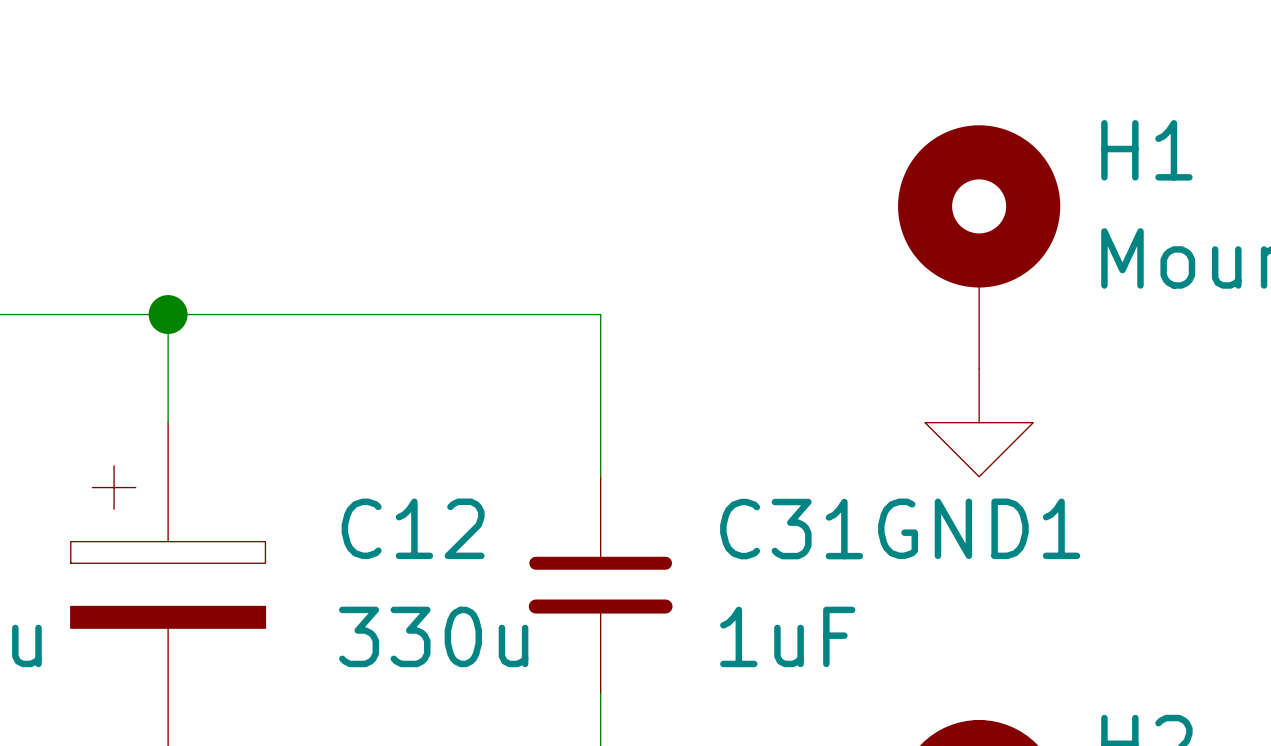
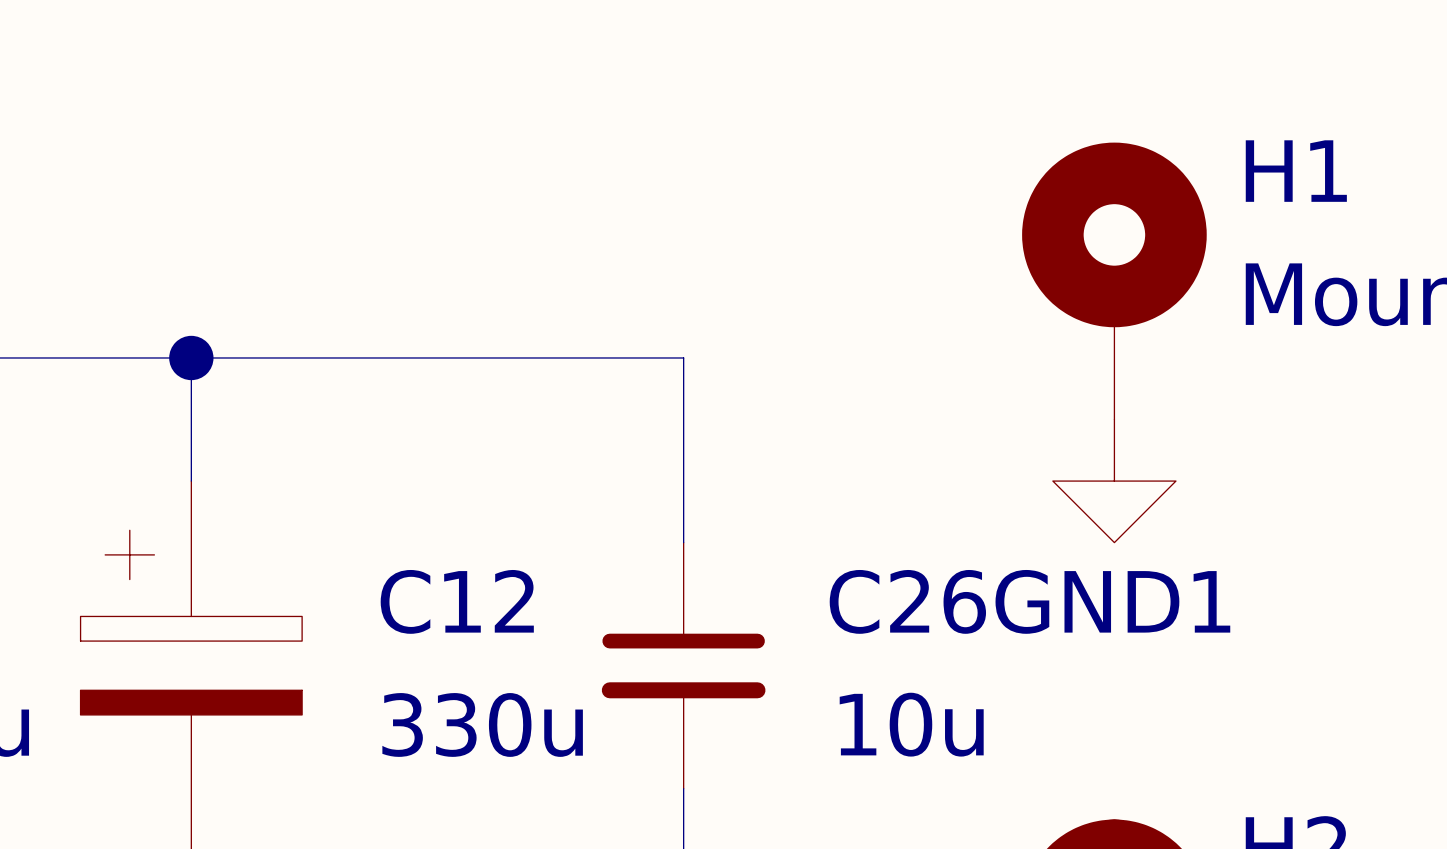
C31 name: C31 (791, 529) -> C26 (907, 601)
C31 value: 1uF (787, 636) -> 10u (911, 724)

